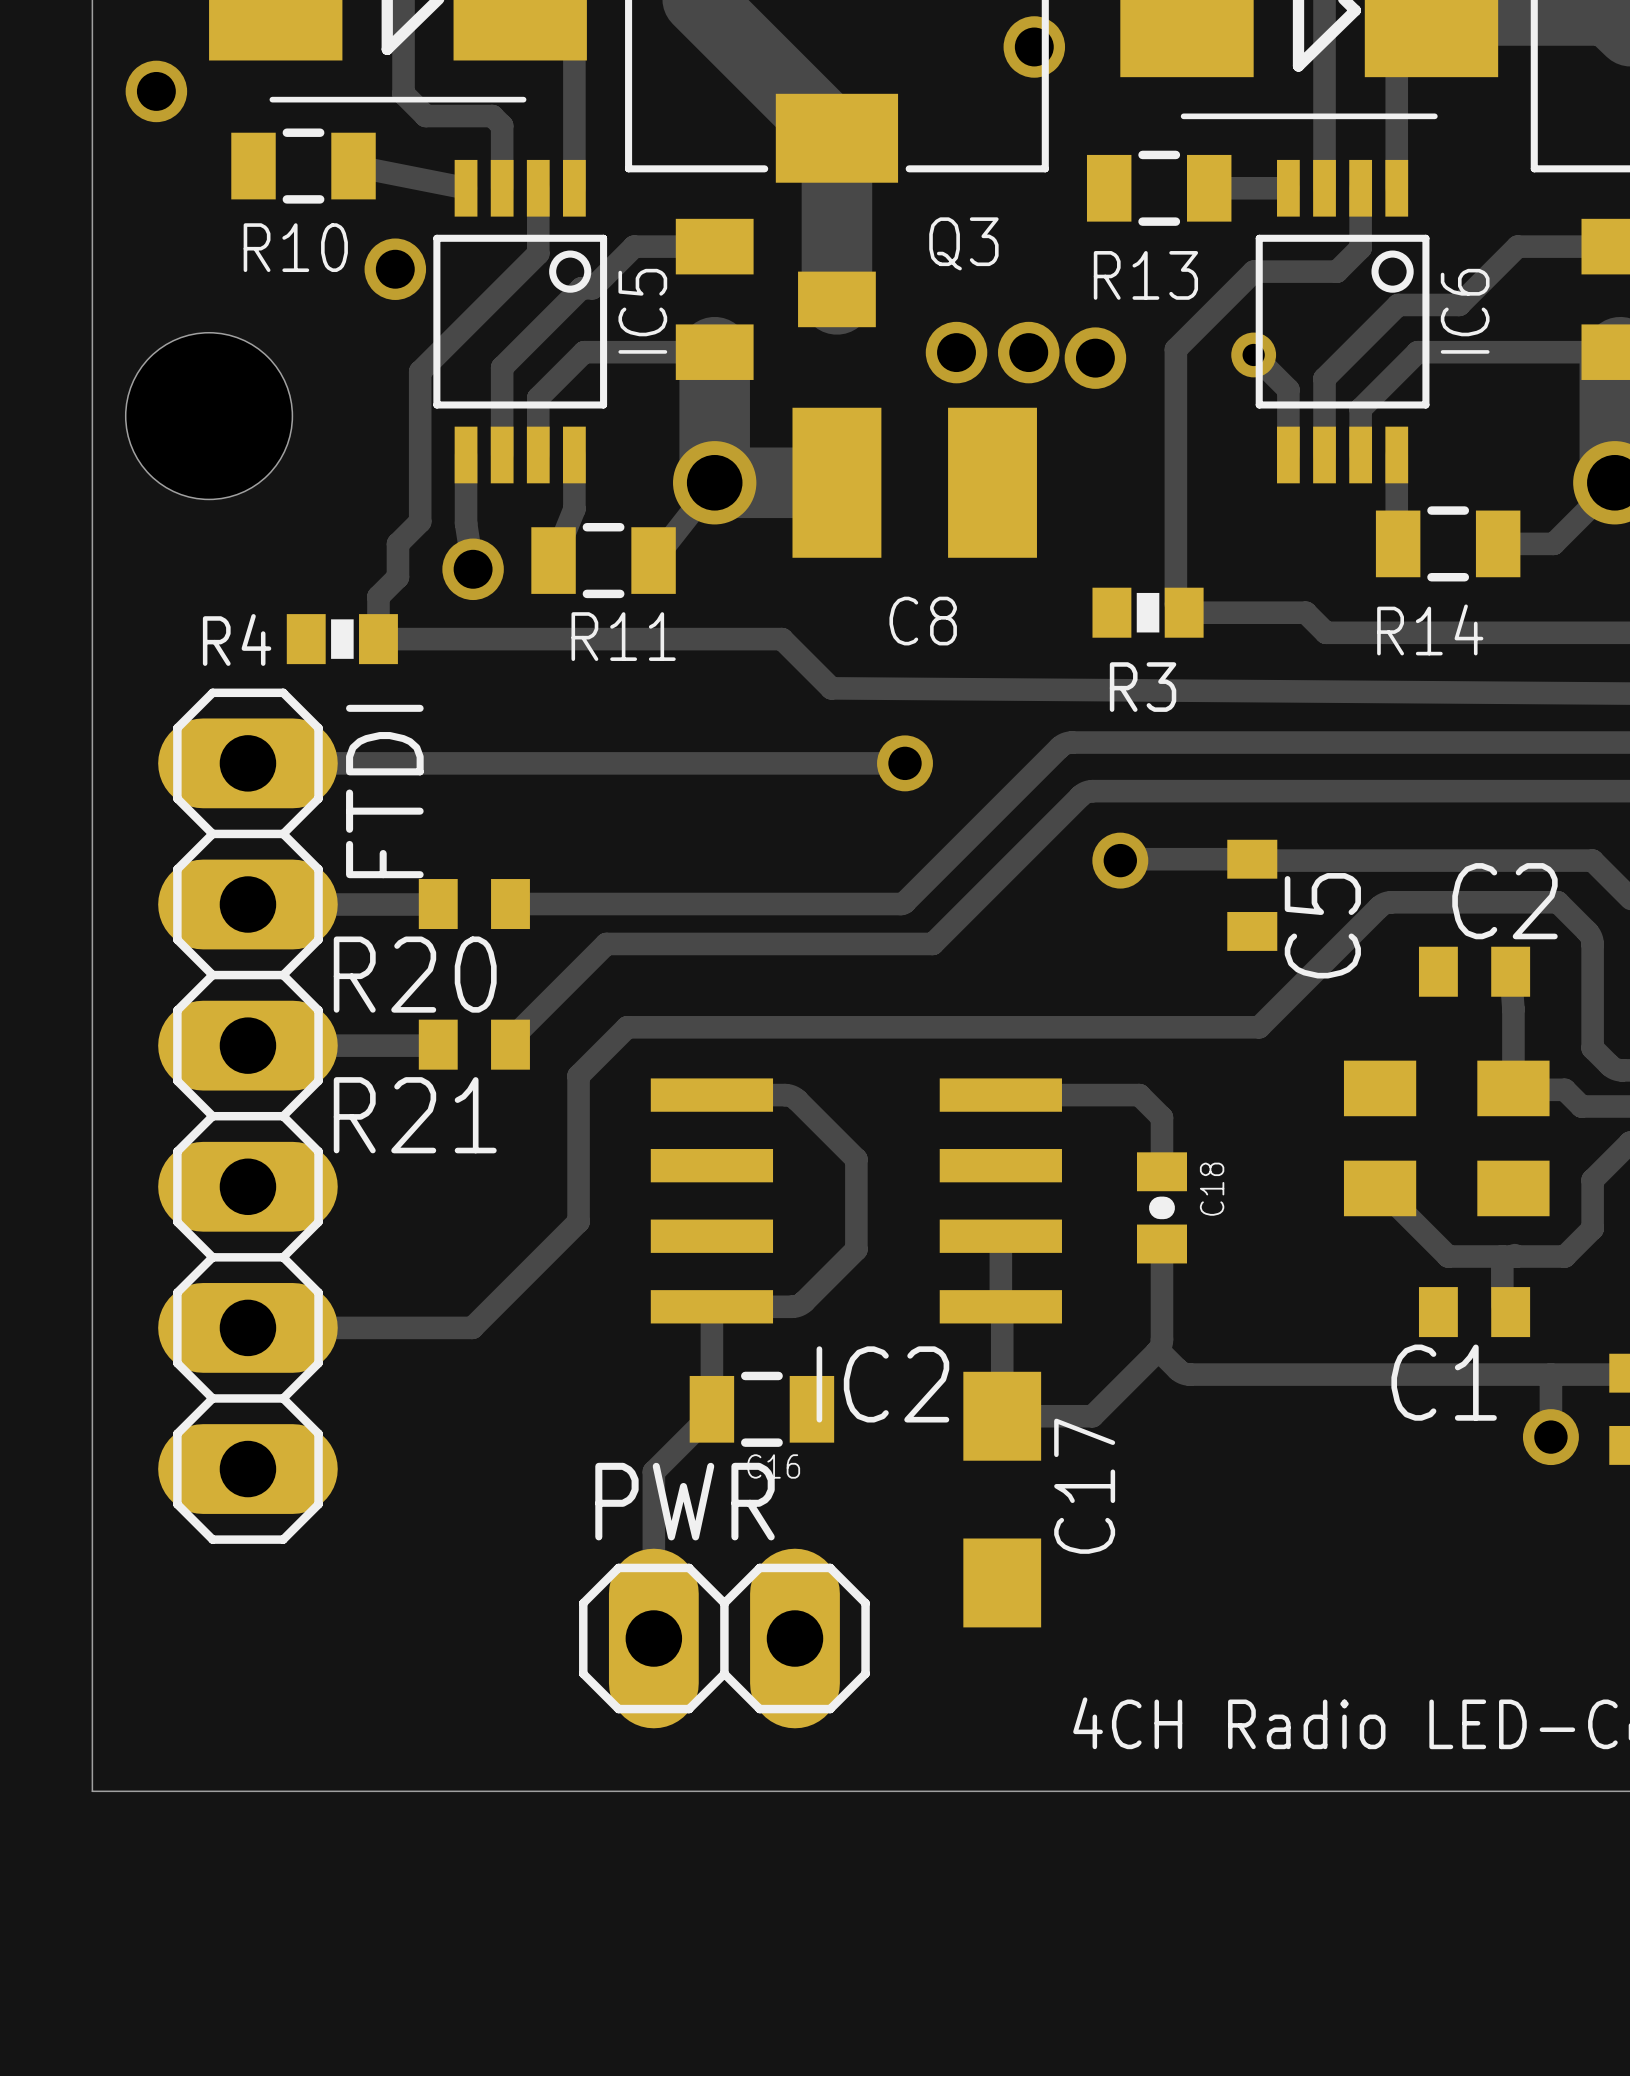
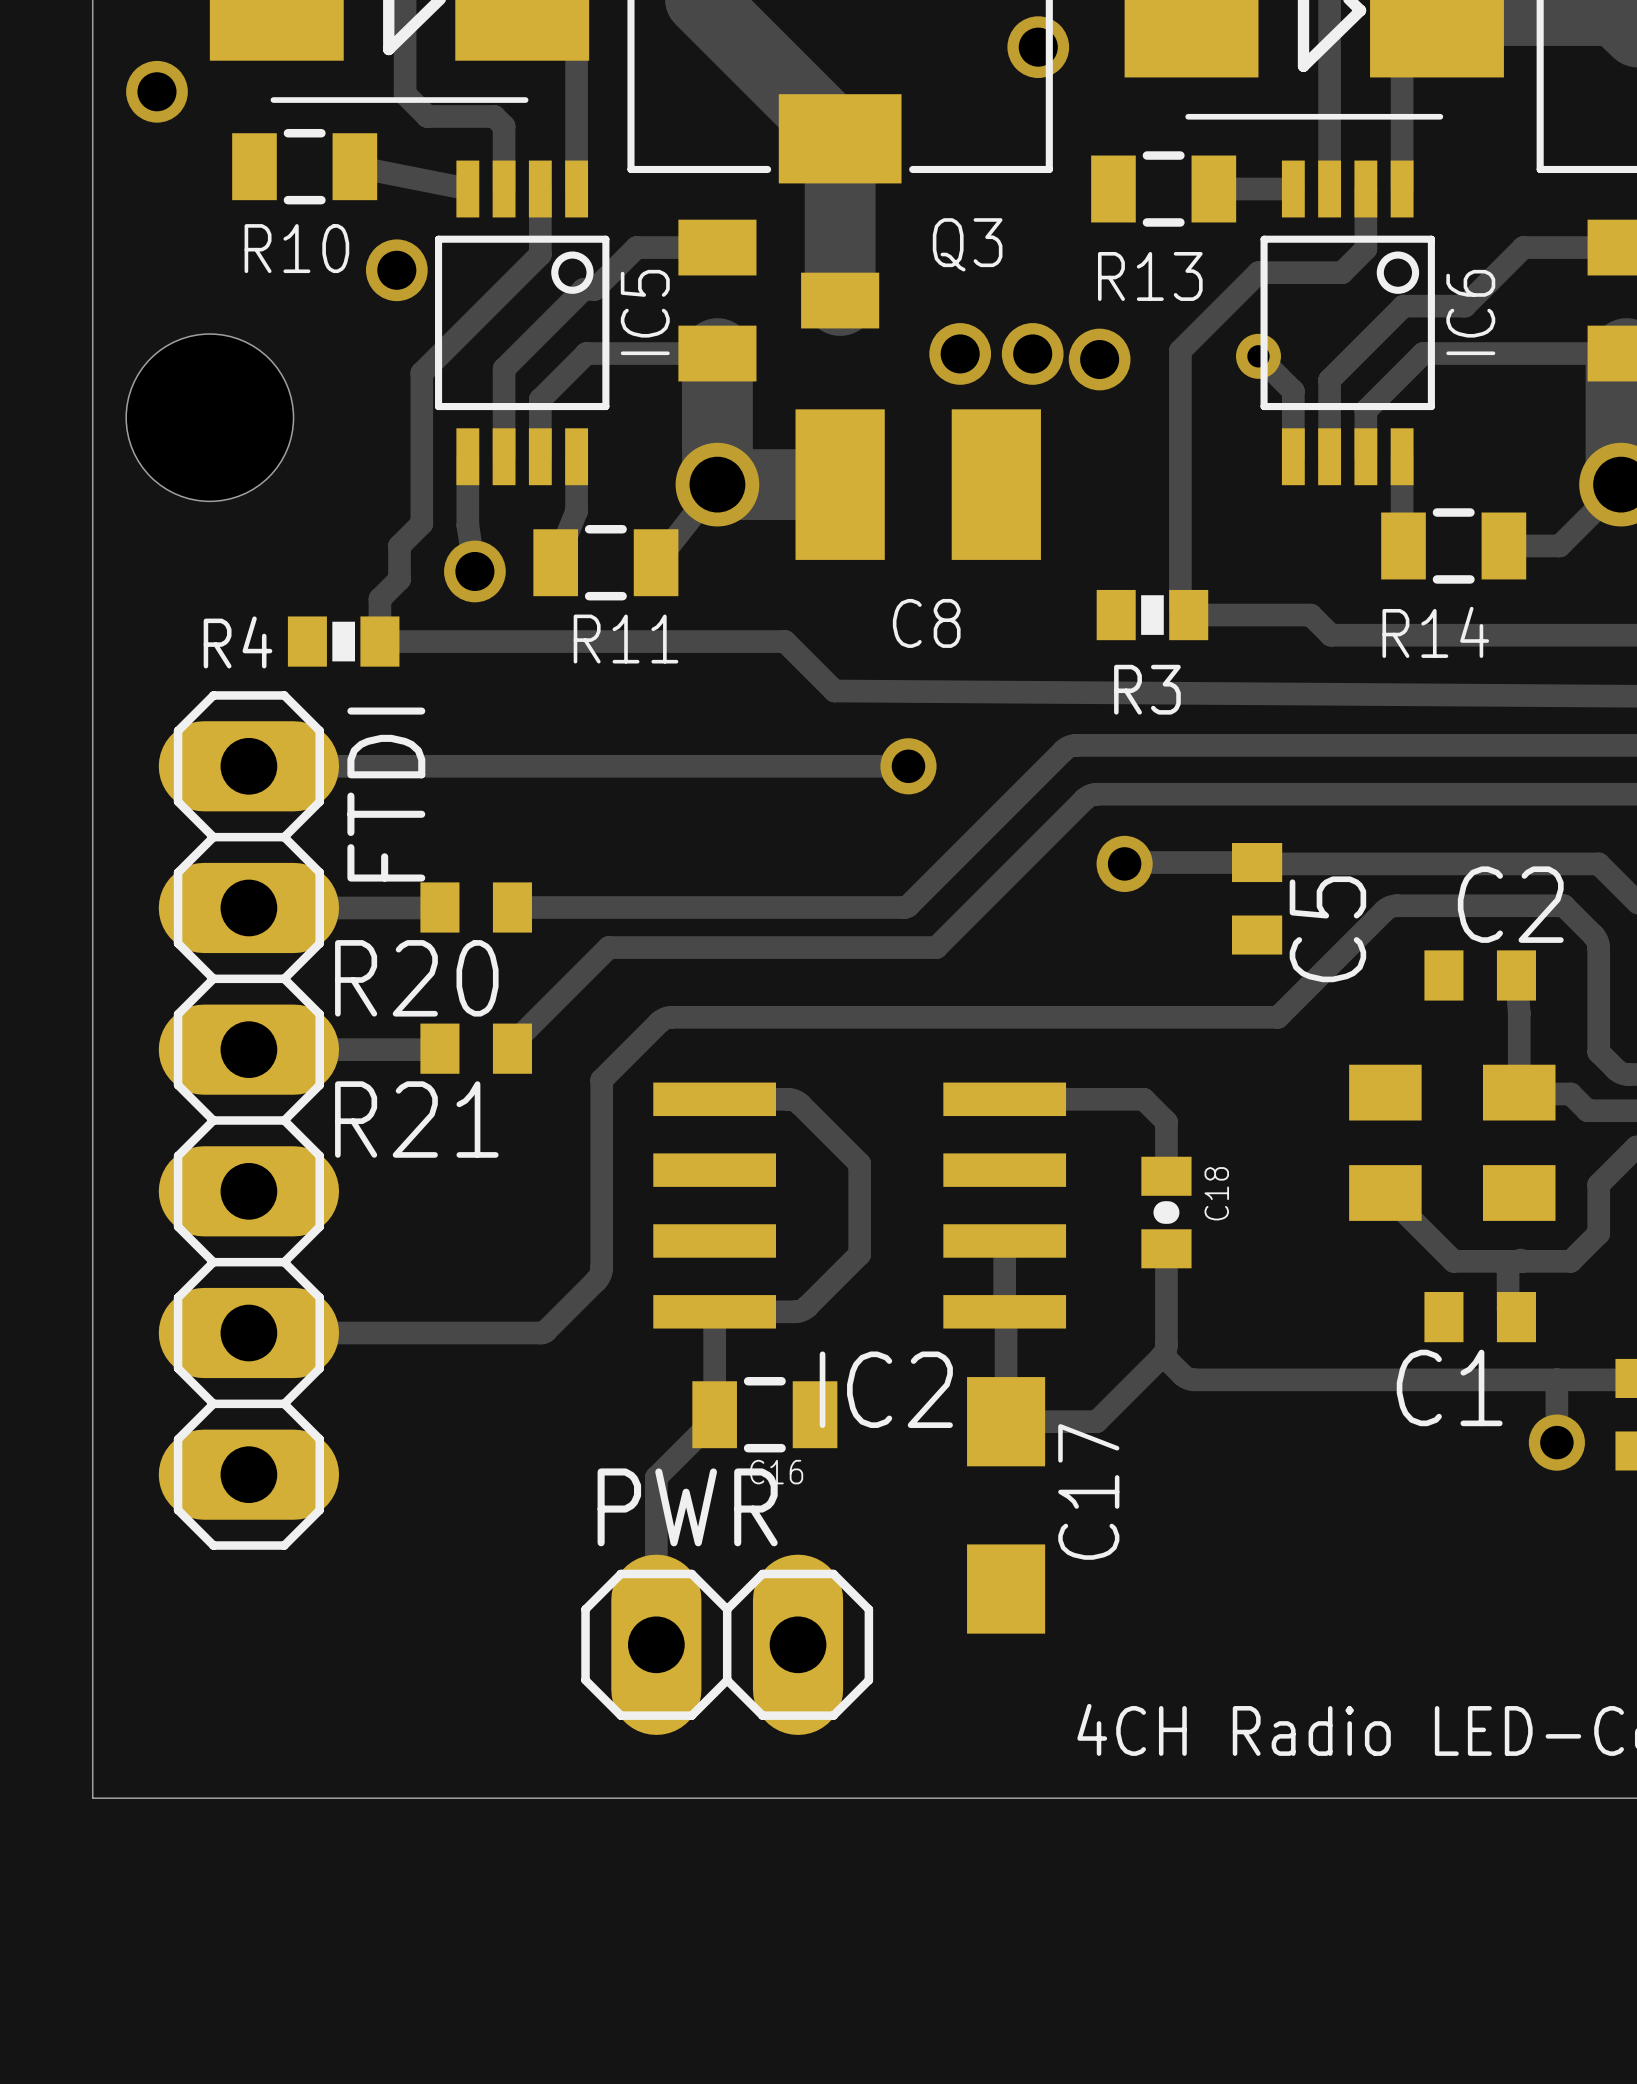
track: (1273, 1013) (1259, 1027) (627, 1027) (578, 1075) (578, 1221) (472, 1327) -> (1278, 1017) (665, 1018) (601, 1080) (601, 1267) (599, 1276) (543, 1332) (474, 1333)

